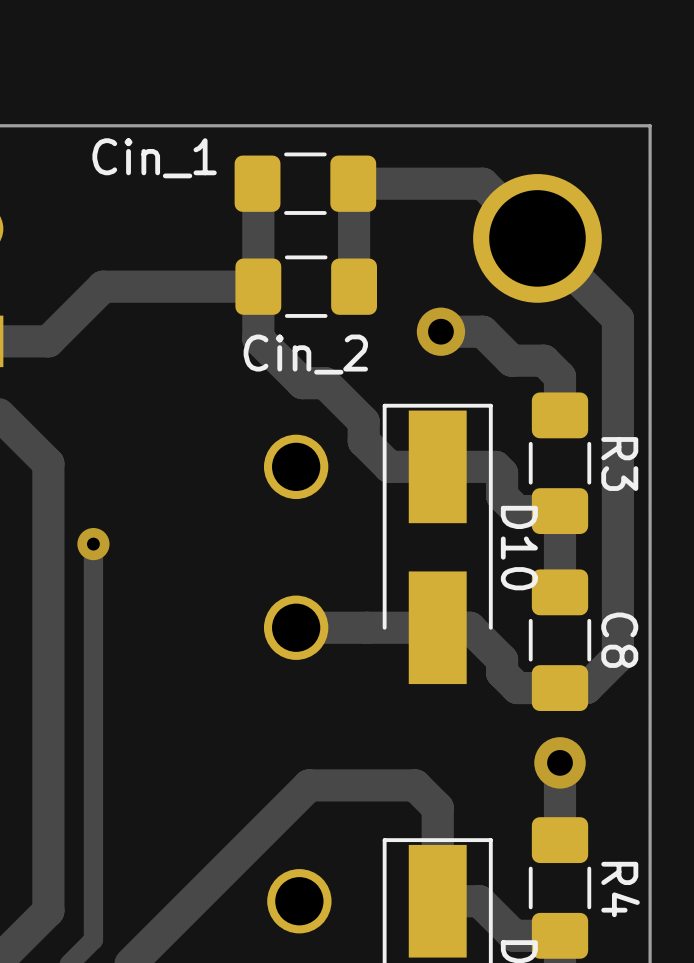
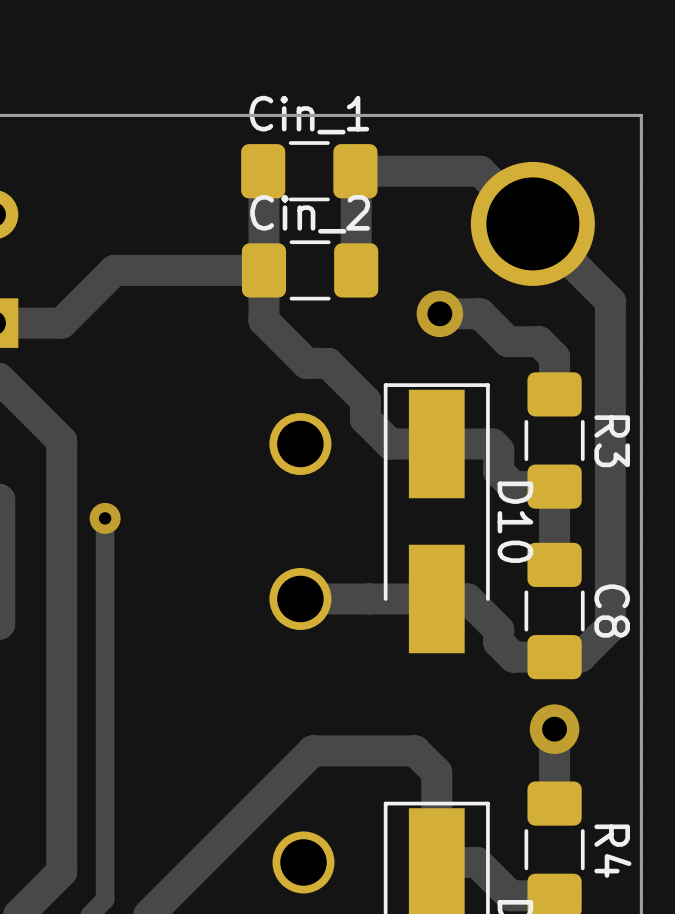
Cin_1 name position: Cin_1 (154, 158) -> Cin_1 (309, 115)
Cin_2 name position: Cin_2 (305, 354) -> Cin_2 (310, 214)

